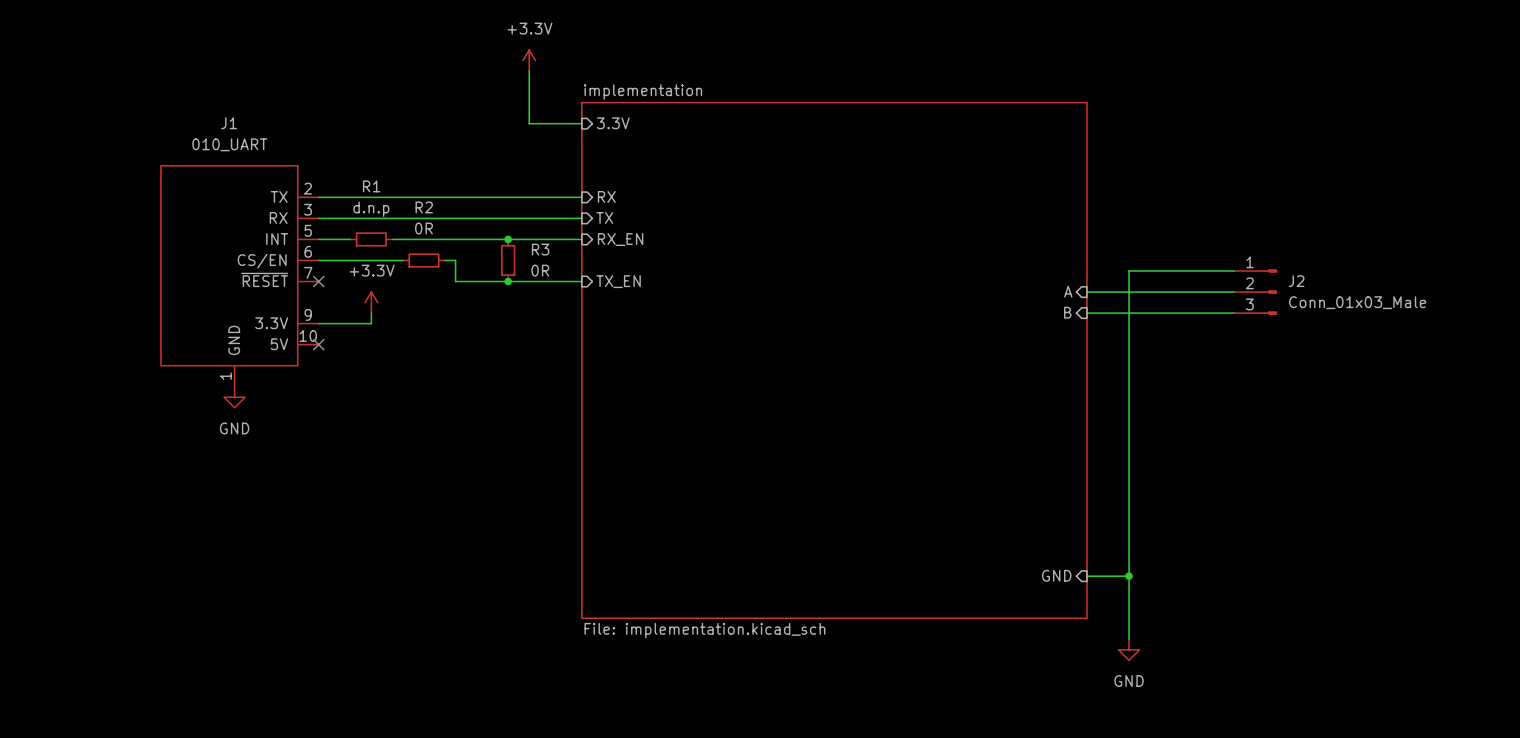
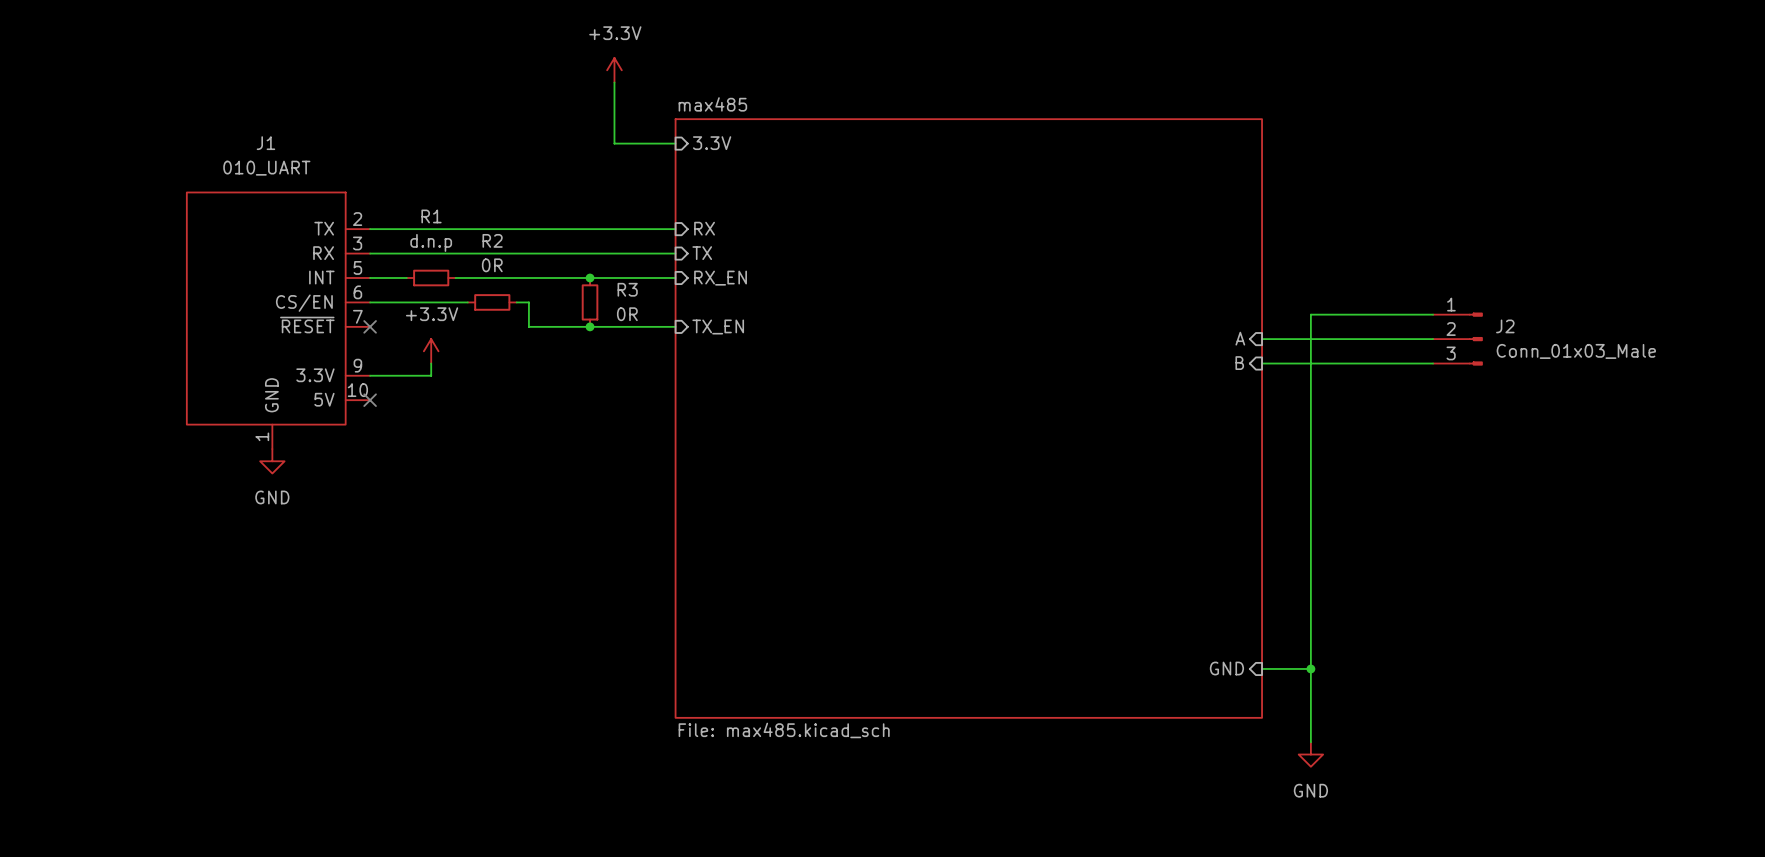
sheet implementation name: implementation (643, 91) -> max485 (712, 104)
sheet implementation value: File: implementation.kicad_sch (704, 630) -> File: max485.kicad_sch (784, 730)

